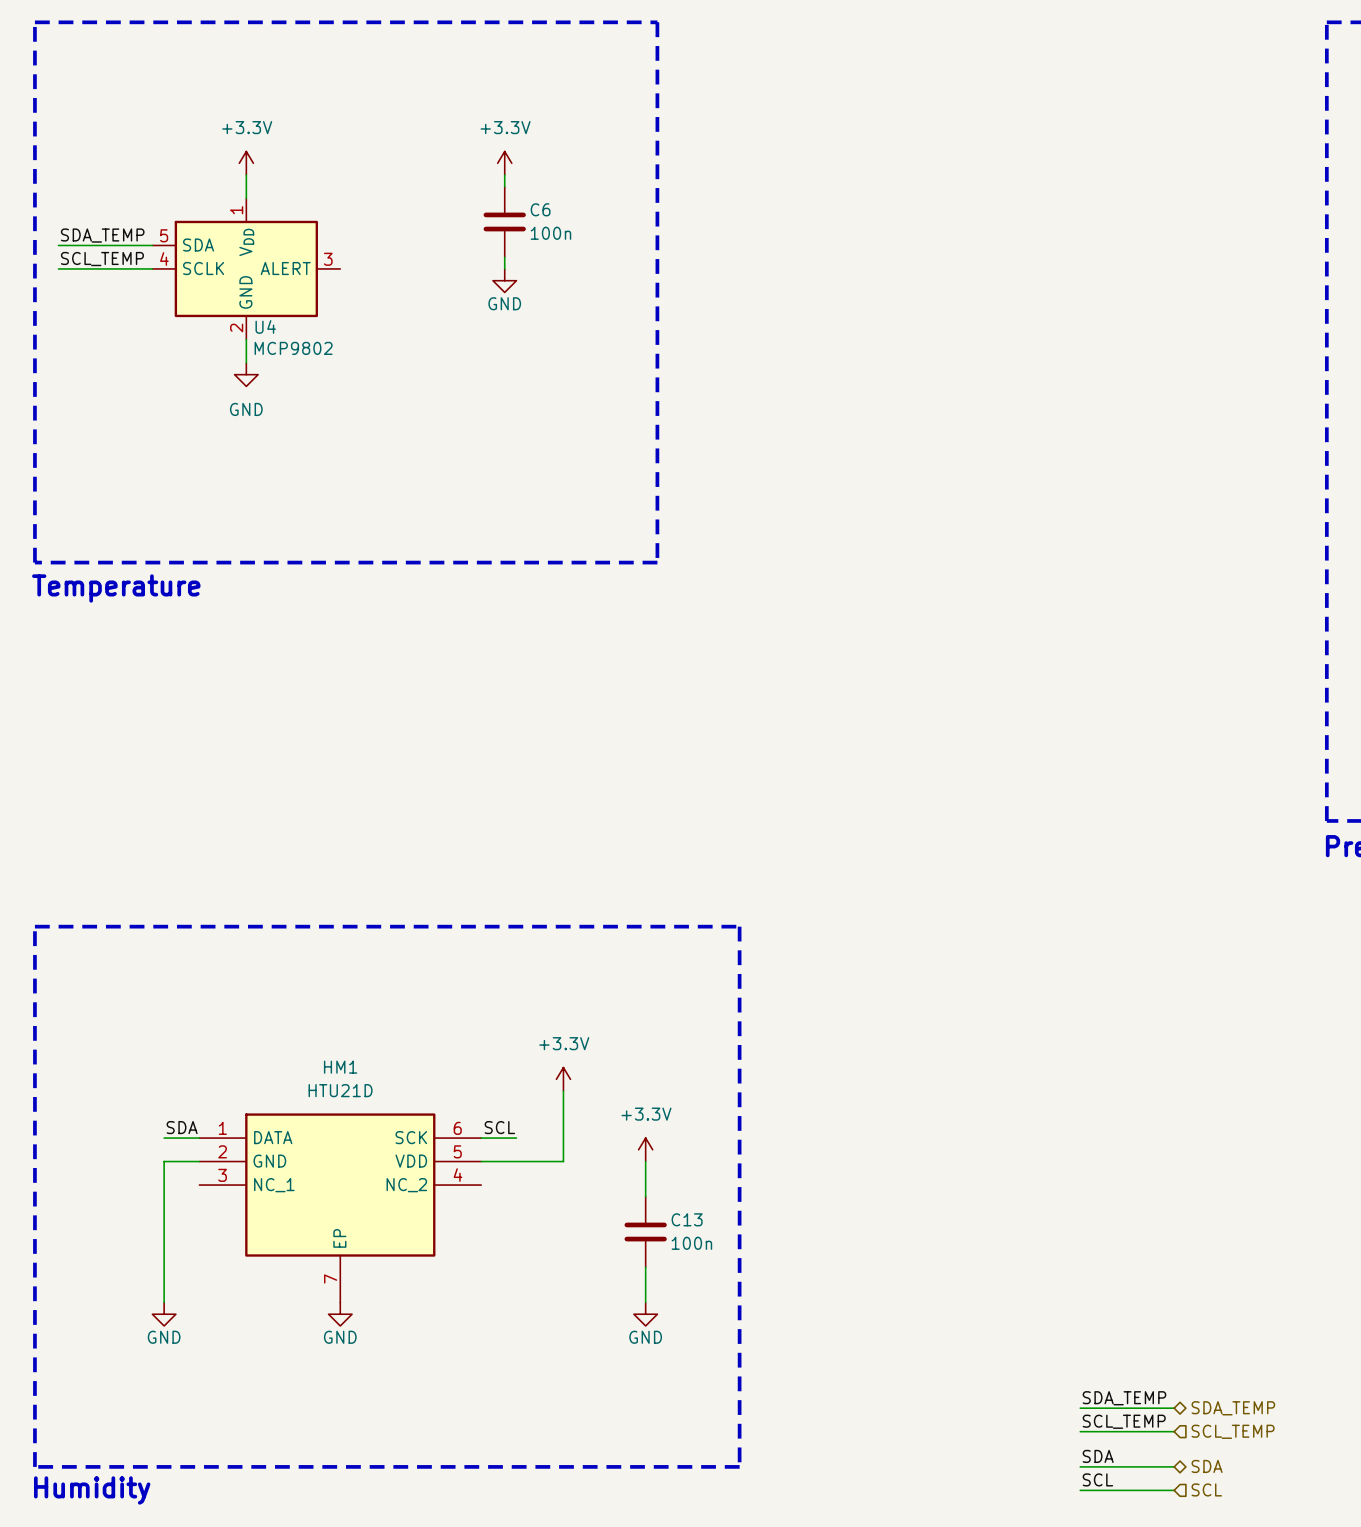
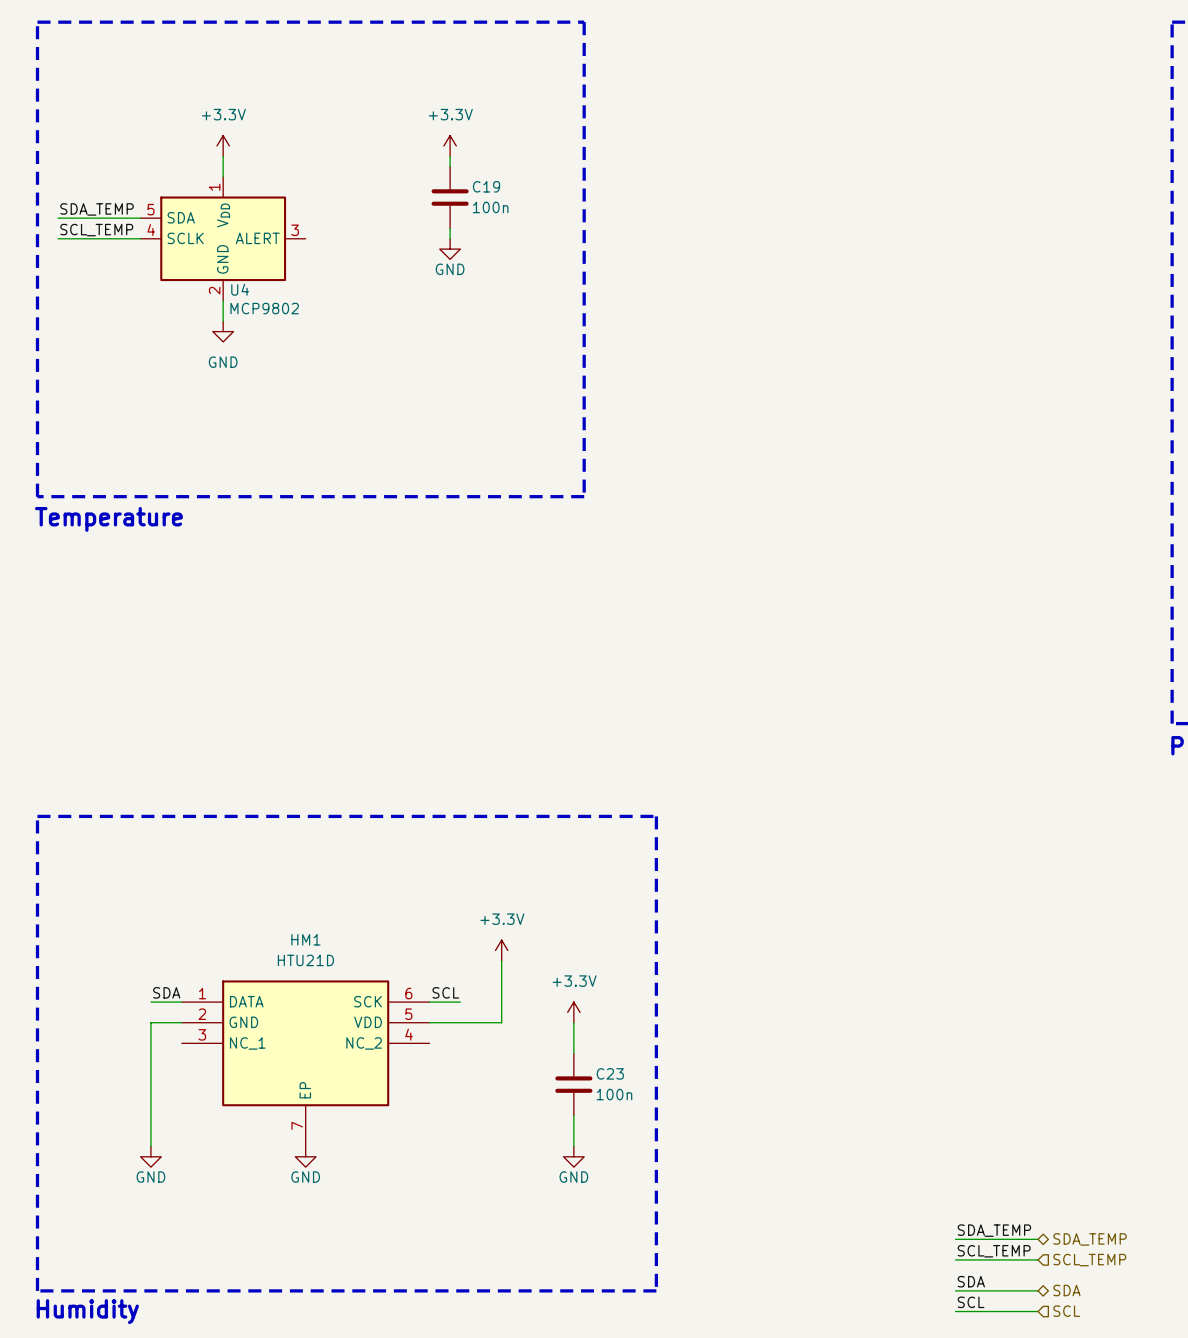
C6 name: C6 (540, 209) -> C19 (486, 186)
C13 name: C13 (687, 1219) -> C23 (610, 1073)

